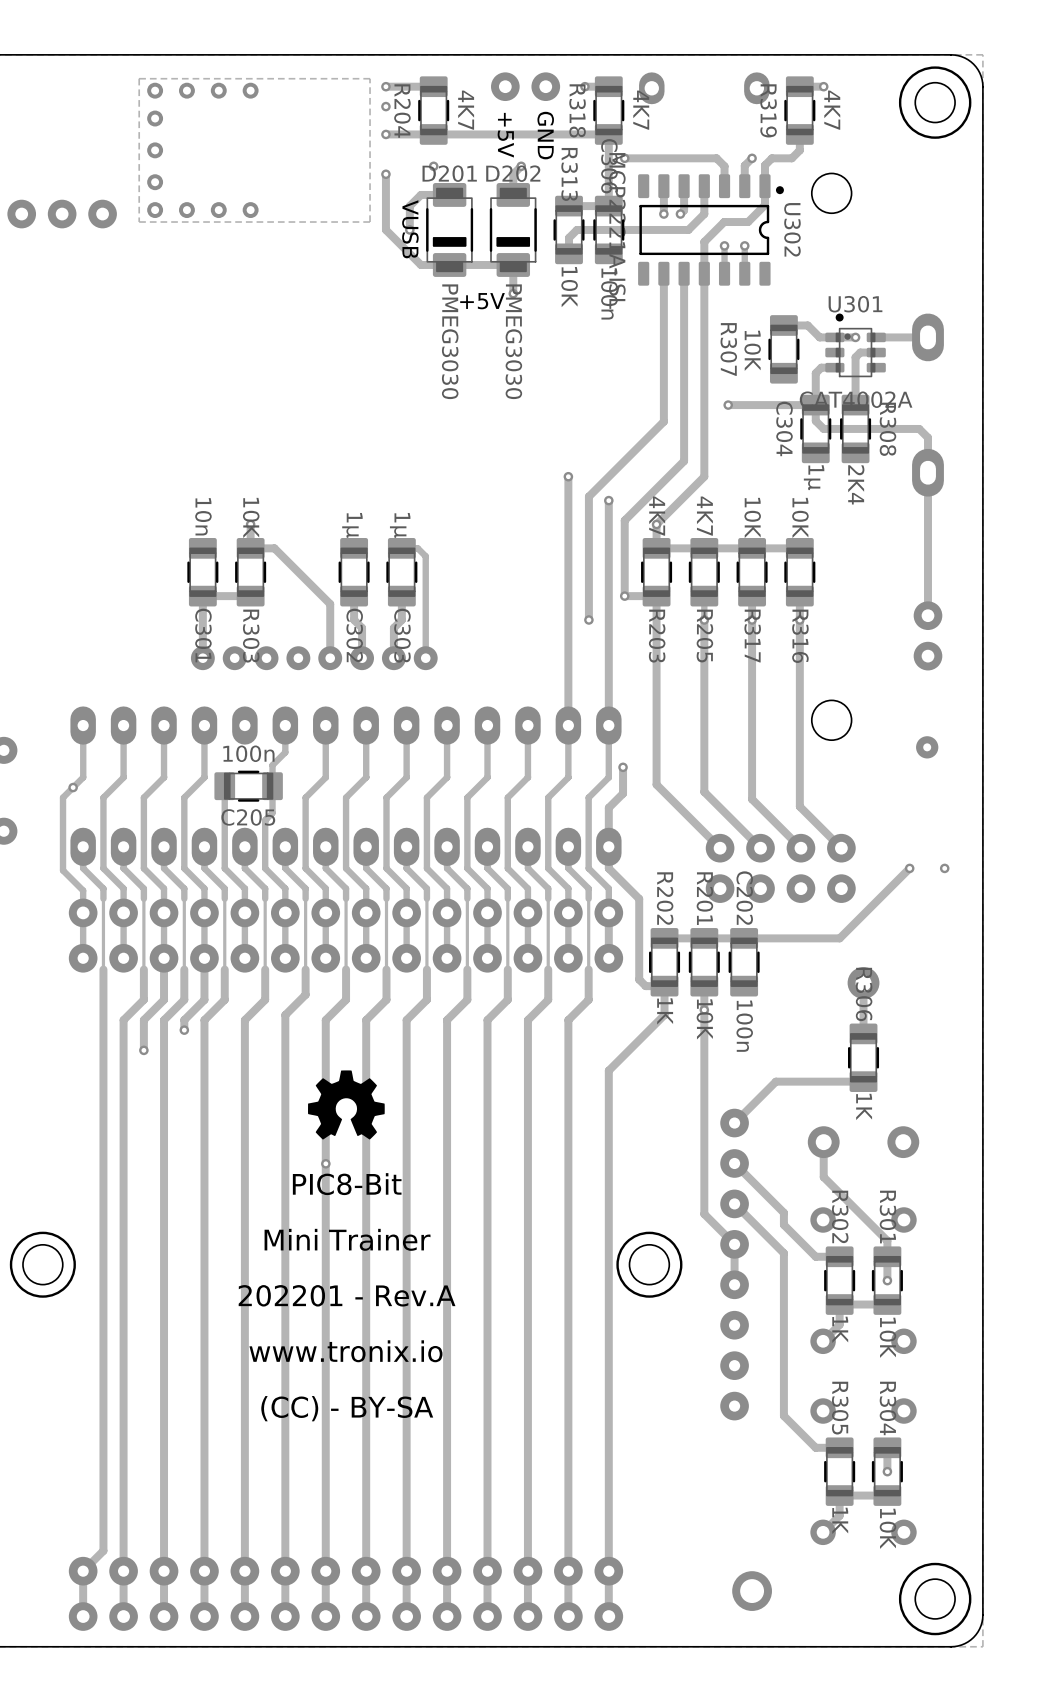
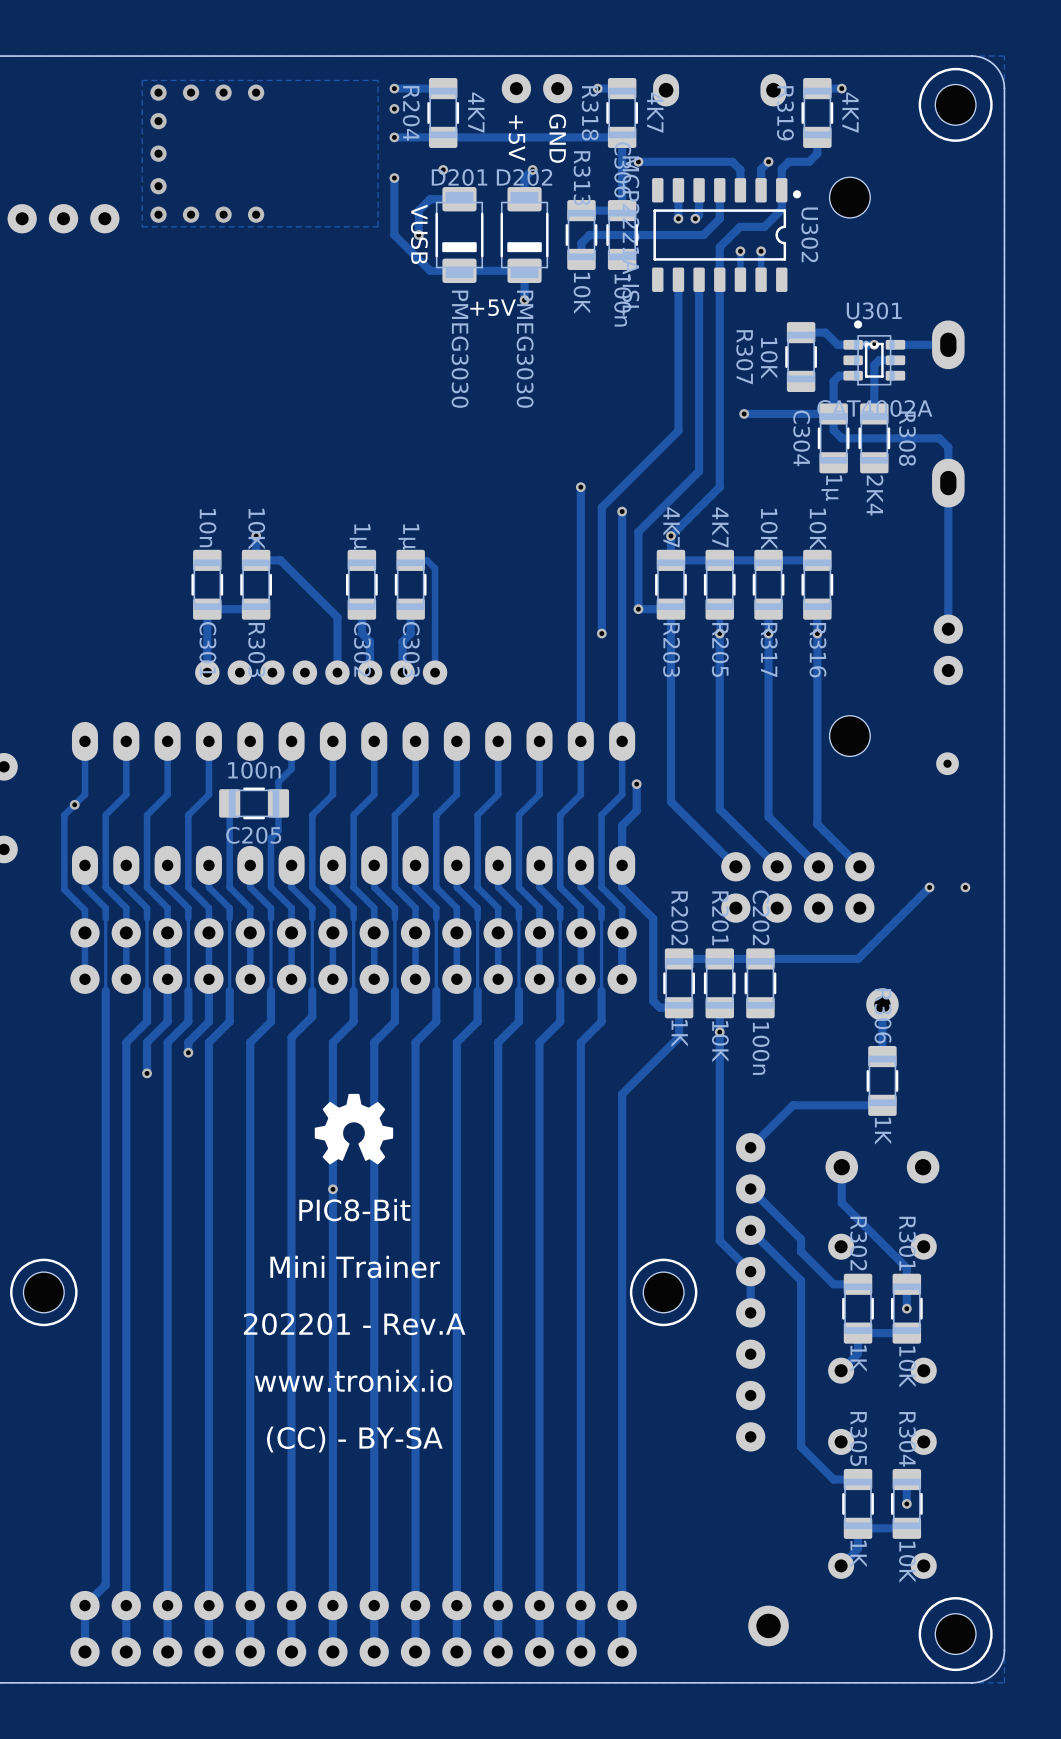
U301 footprint: [825, 327, 886, 378] -> [843, 335, 906, 386]

